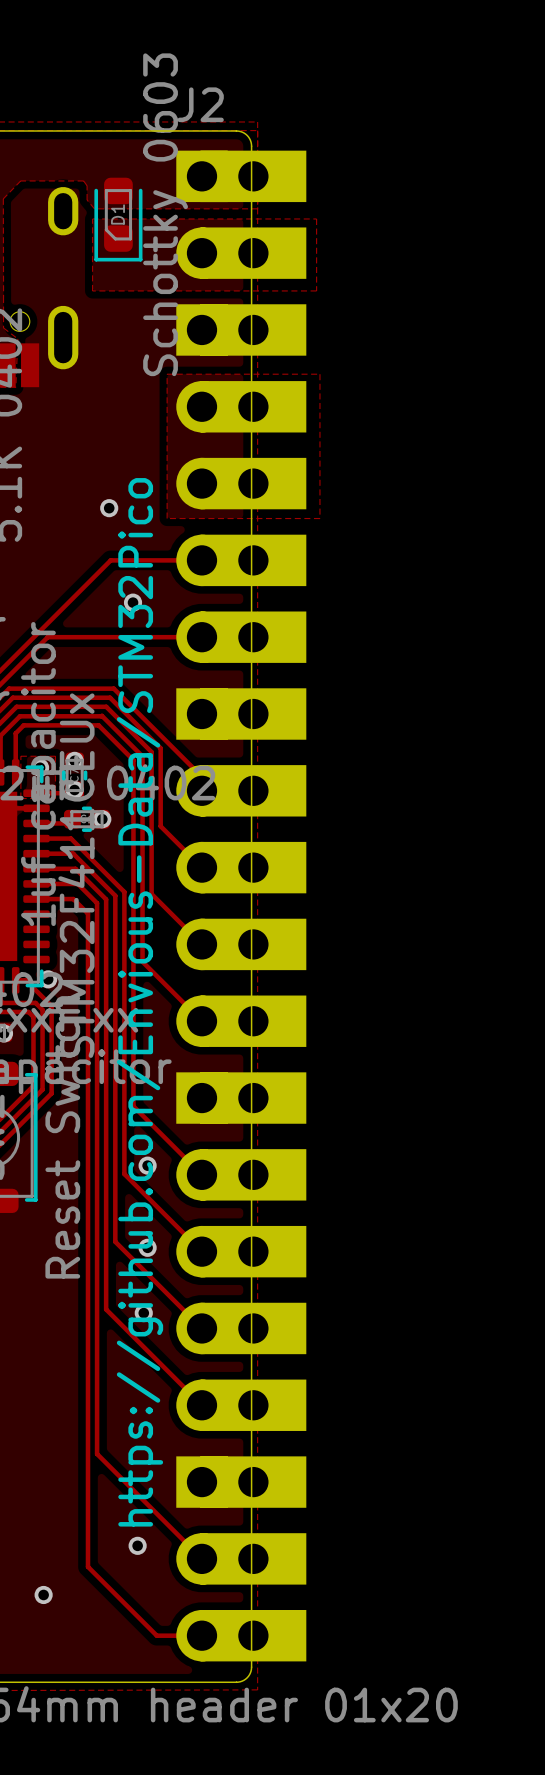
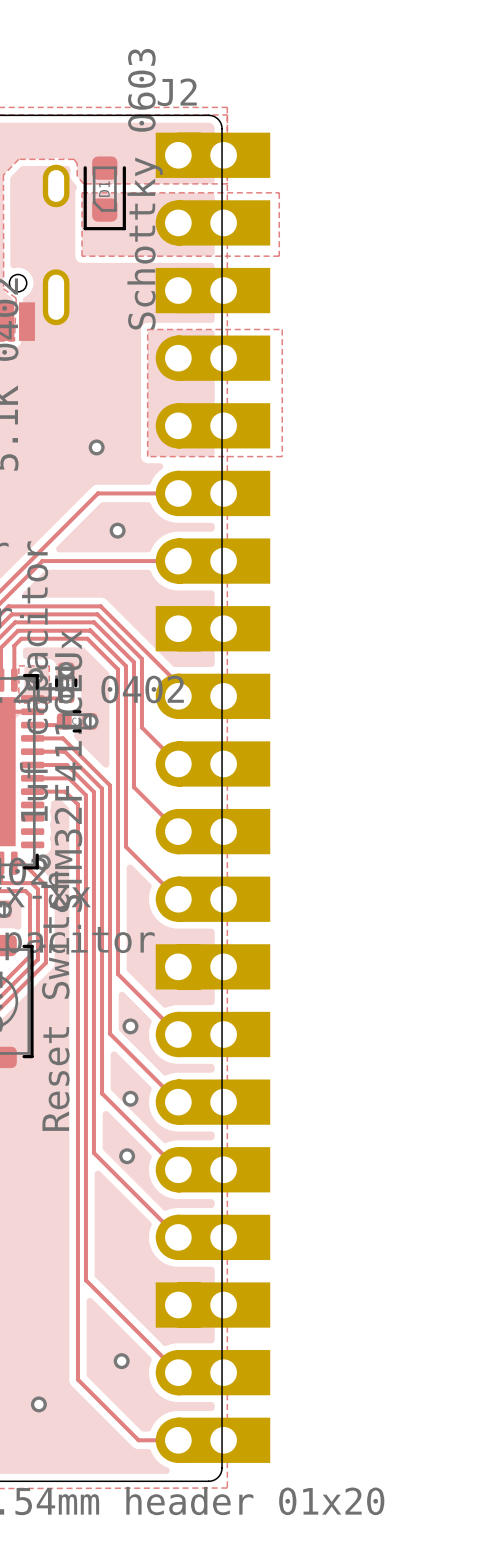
text: https://github.com/Envious-Data/STM32Pico (139, 1002) -> none

